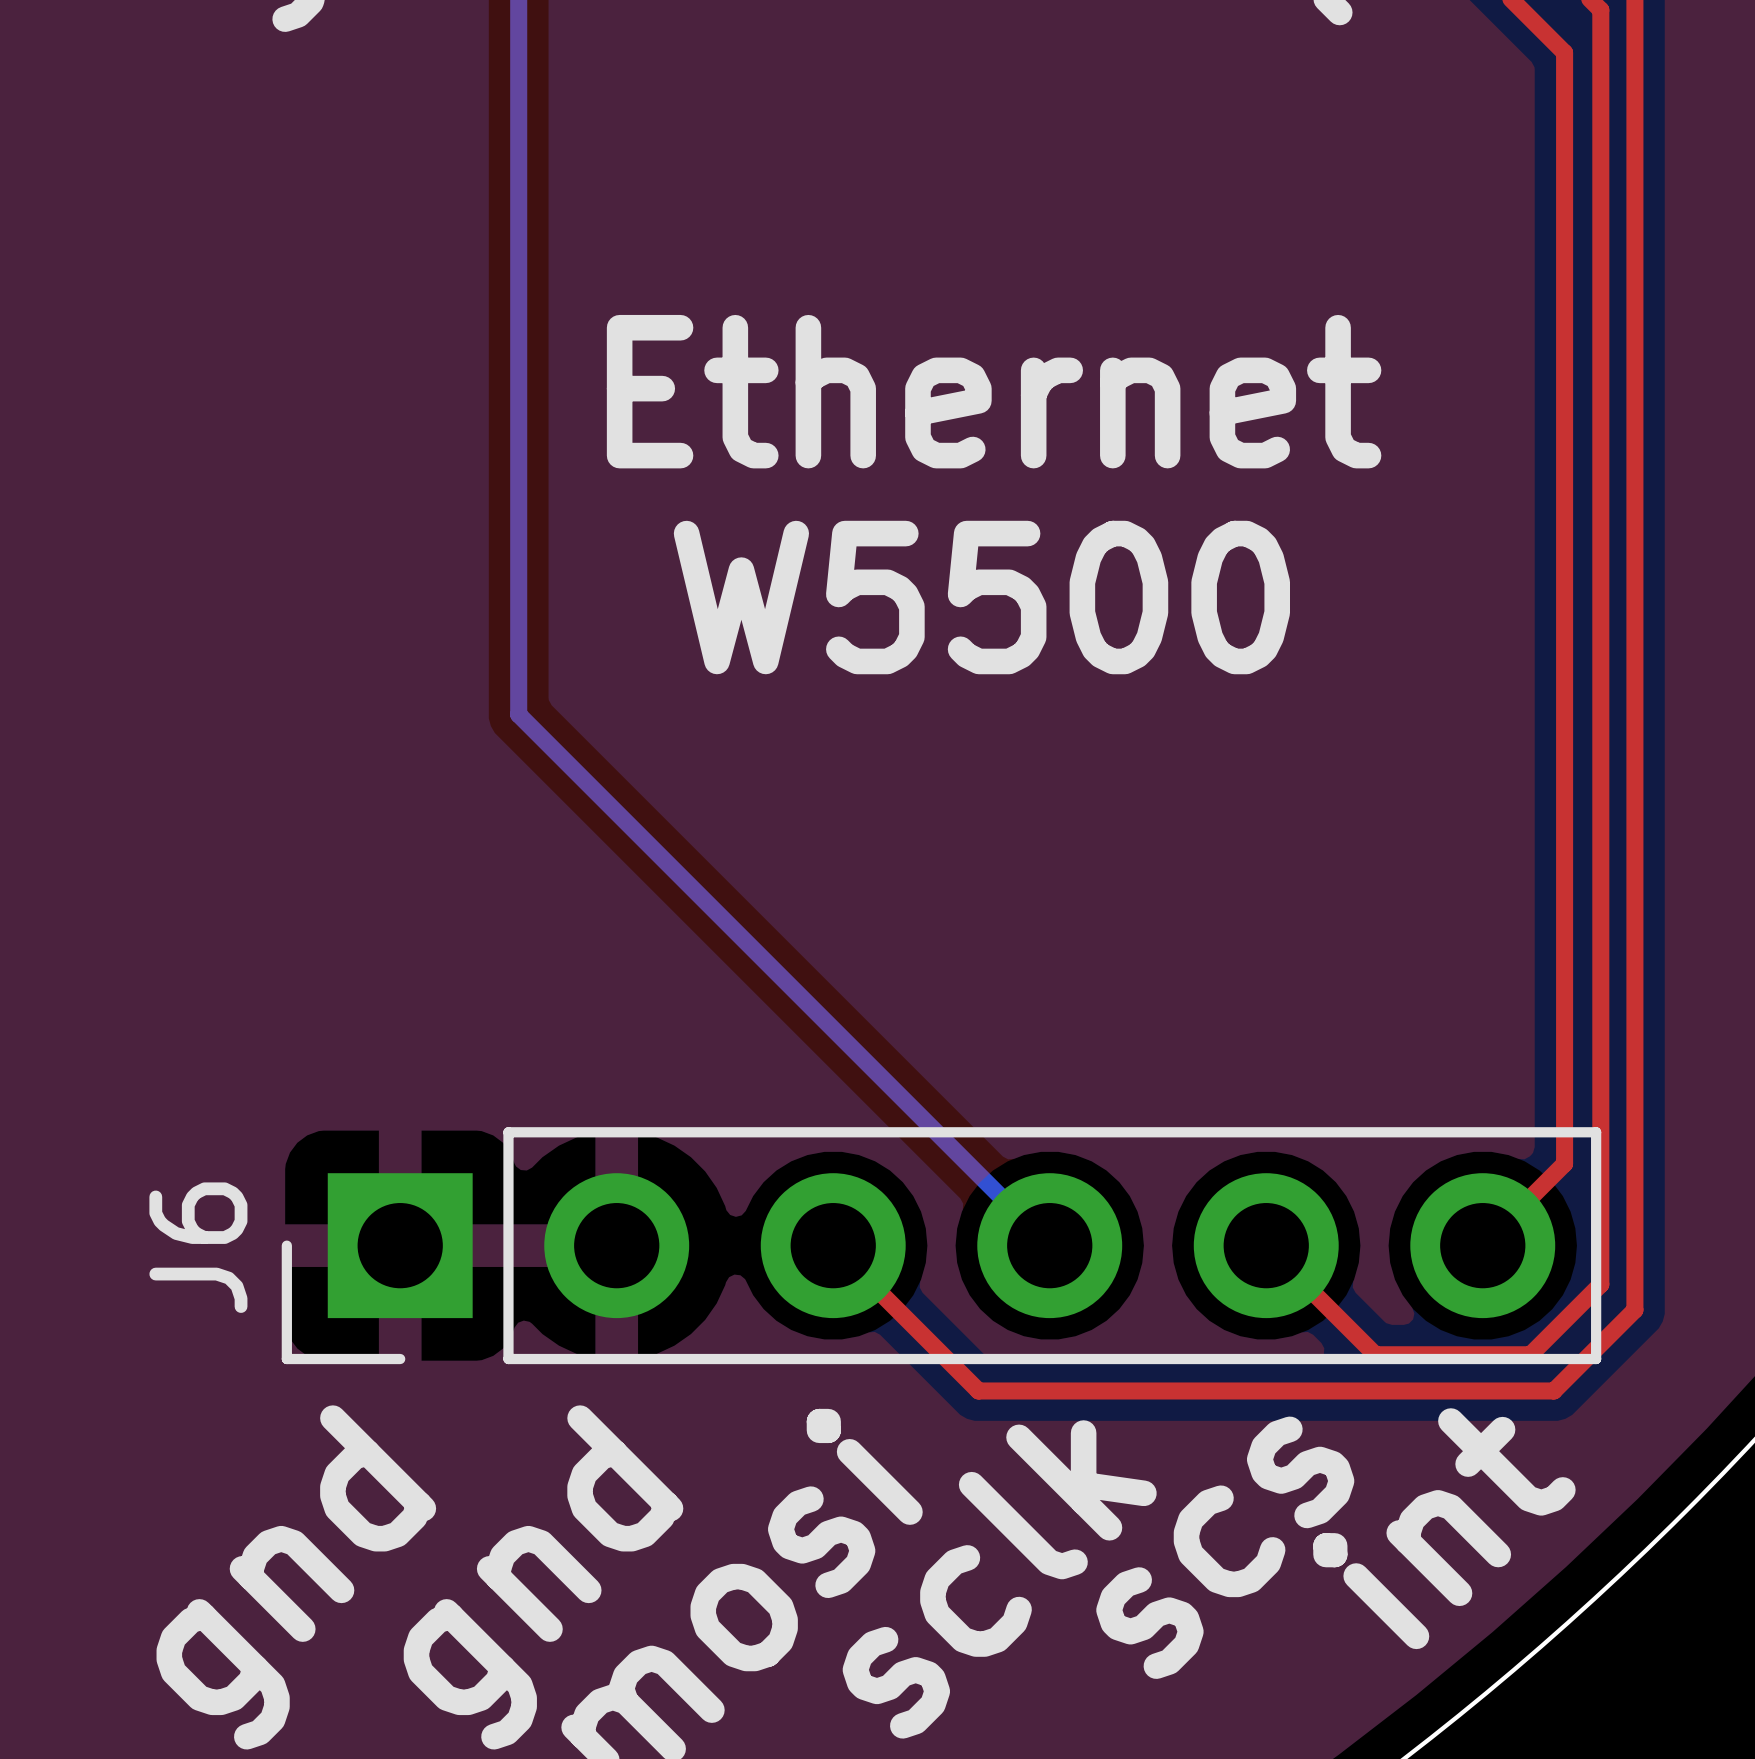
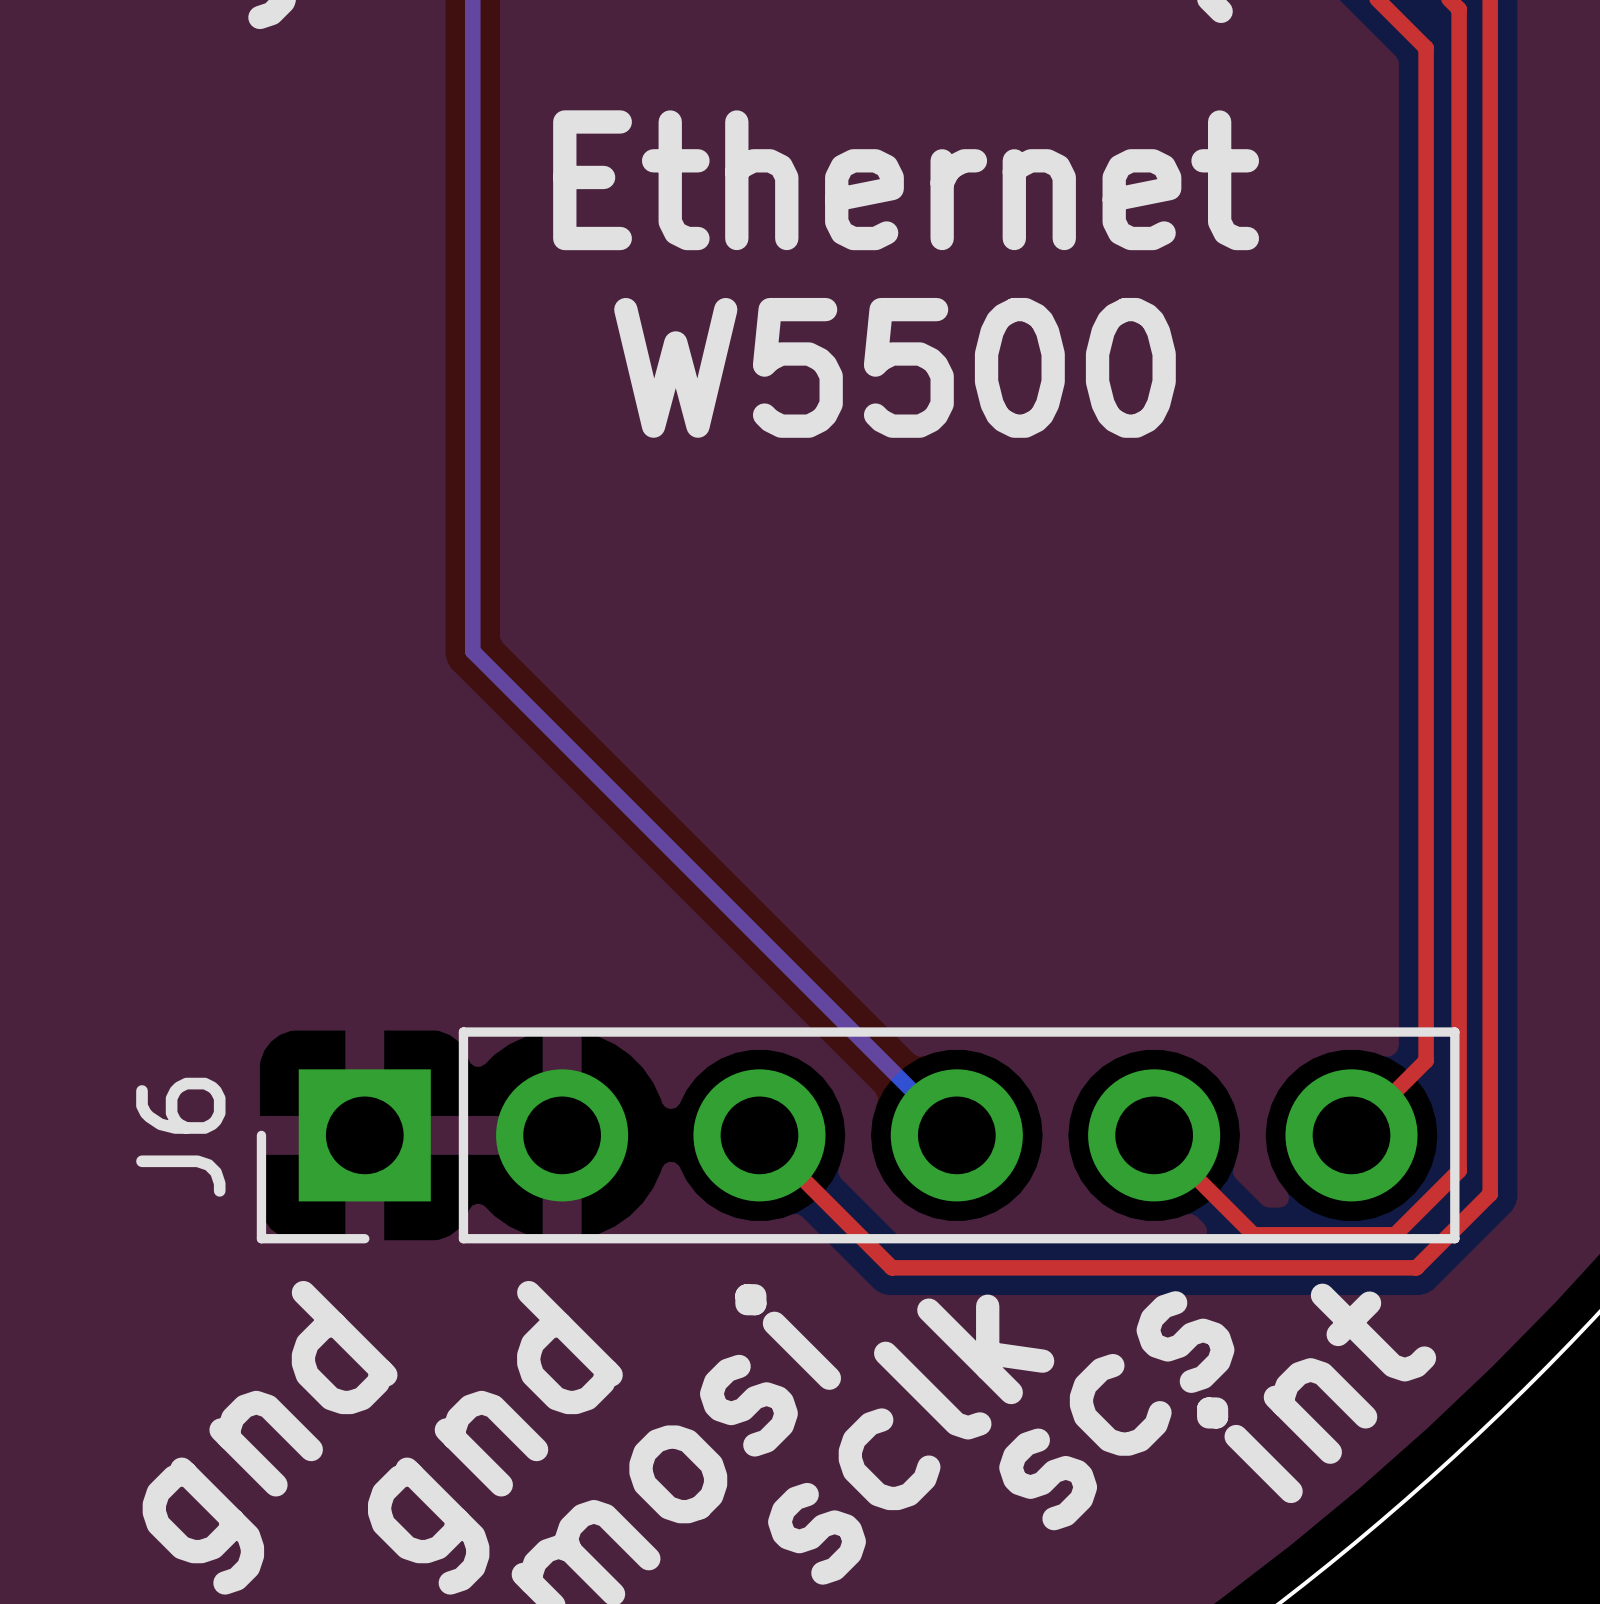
text position: Ethernet (994, 391) -> Ethernet (906, 180)
text position: W5500 (981, 597) -> W5500 (894, 367)

